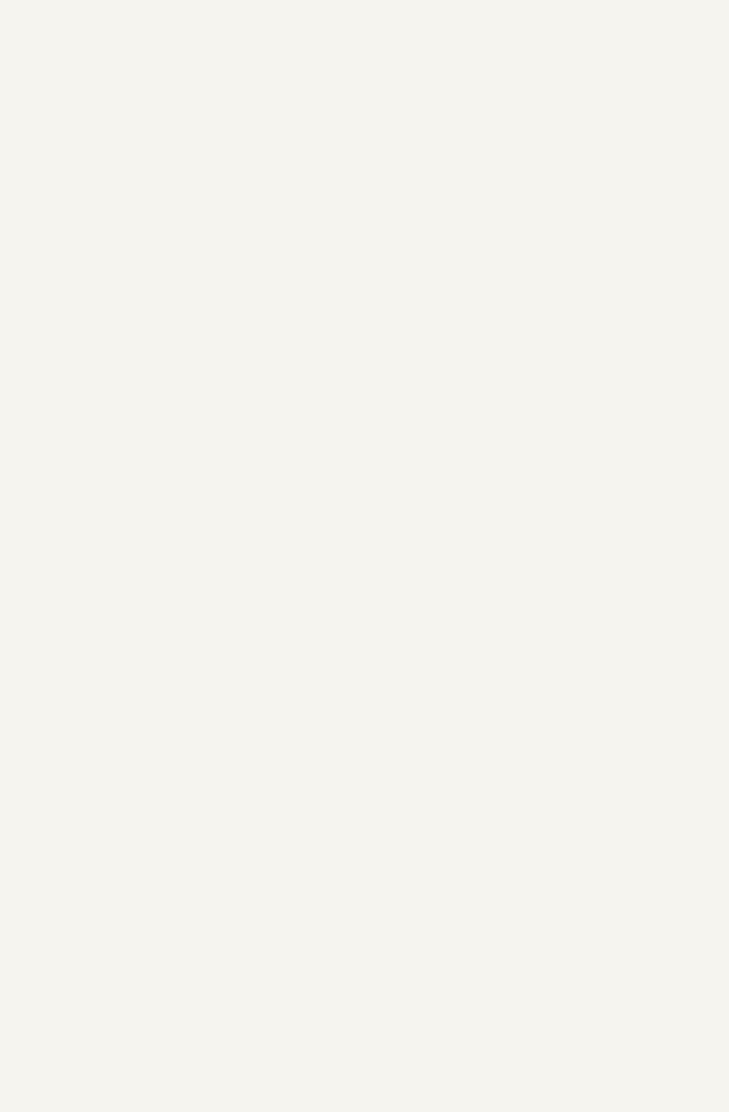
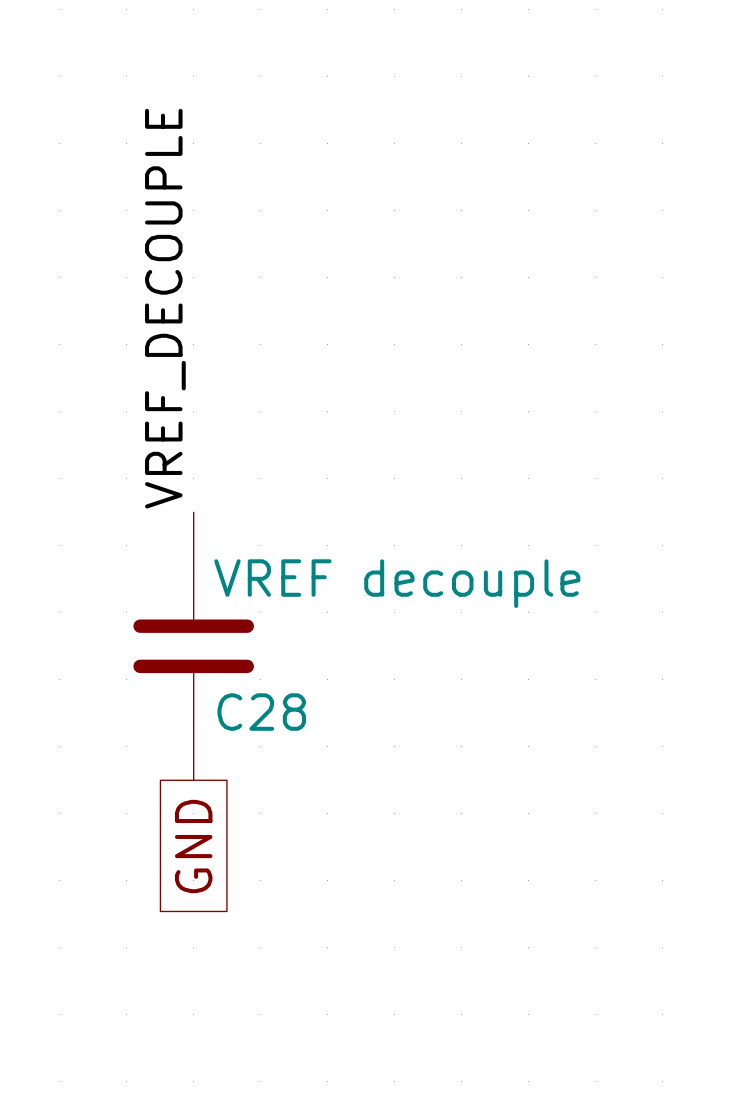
label: none -> VREF_DECOUPLE (165, 308)
C28: none -> VREF decouple (193, 646)
global label: none -> GND (193, 846)

